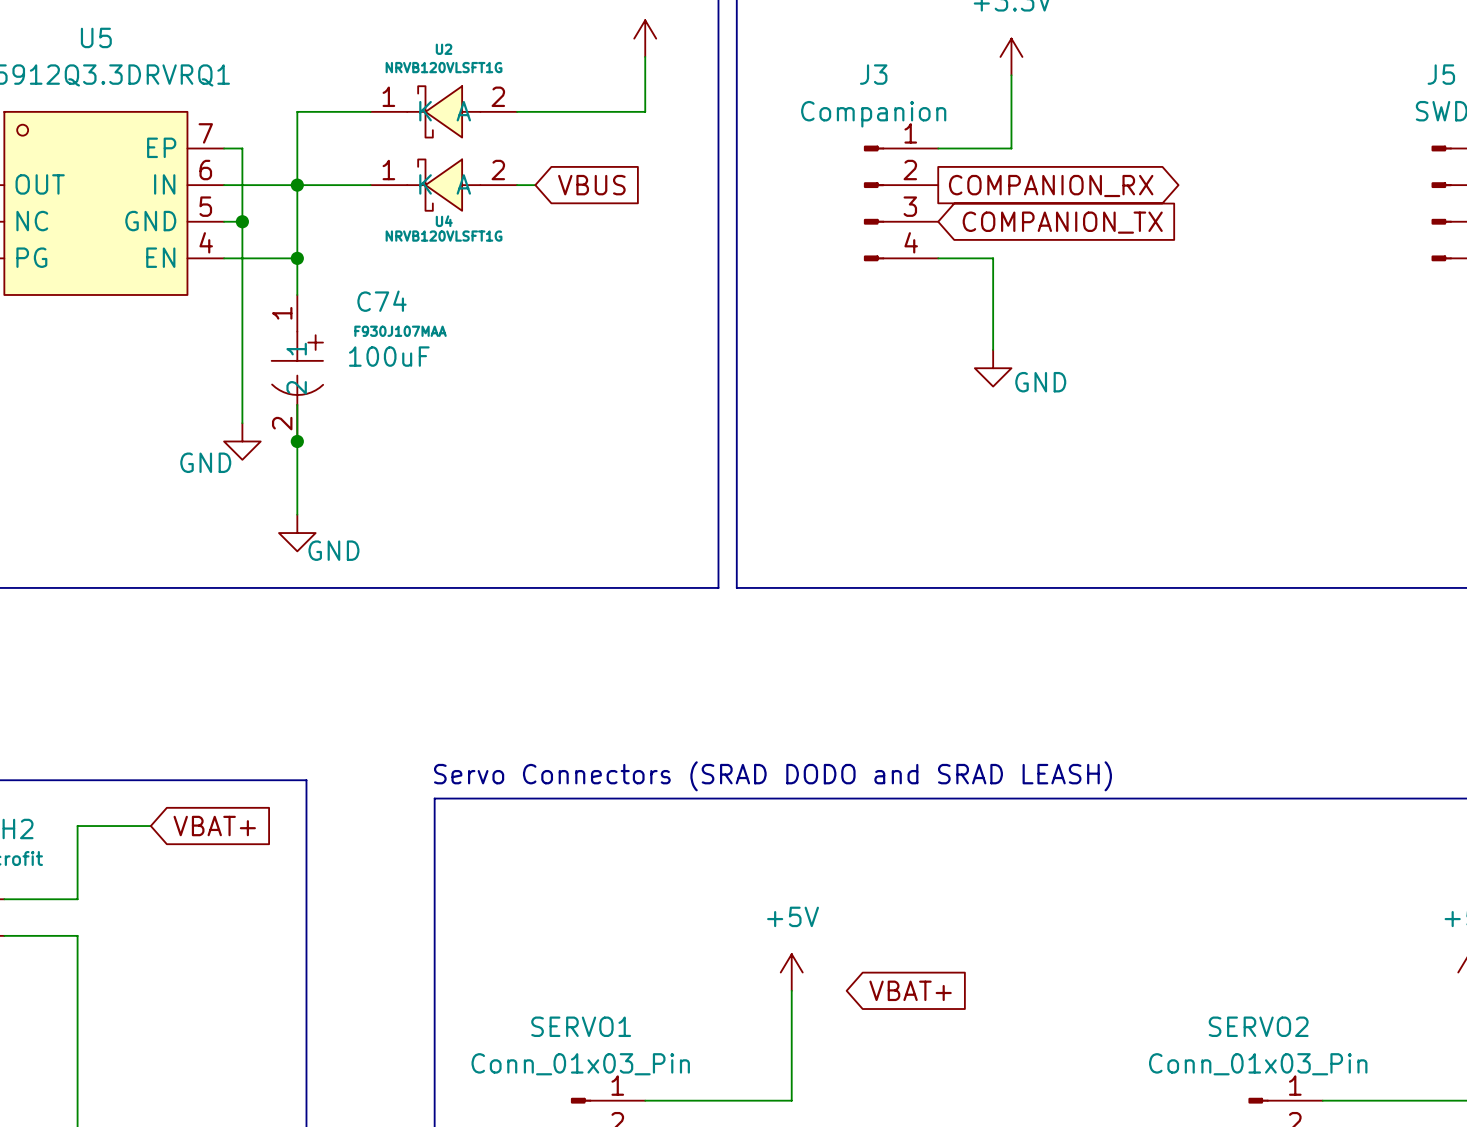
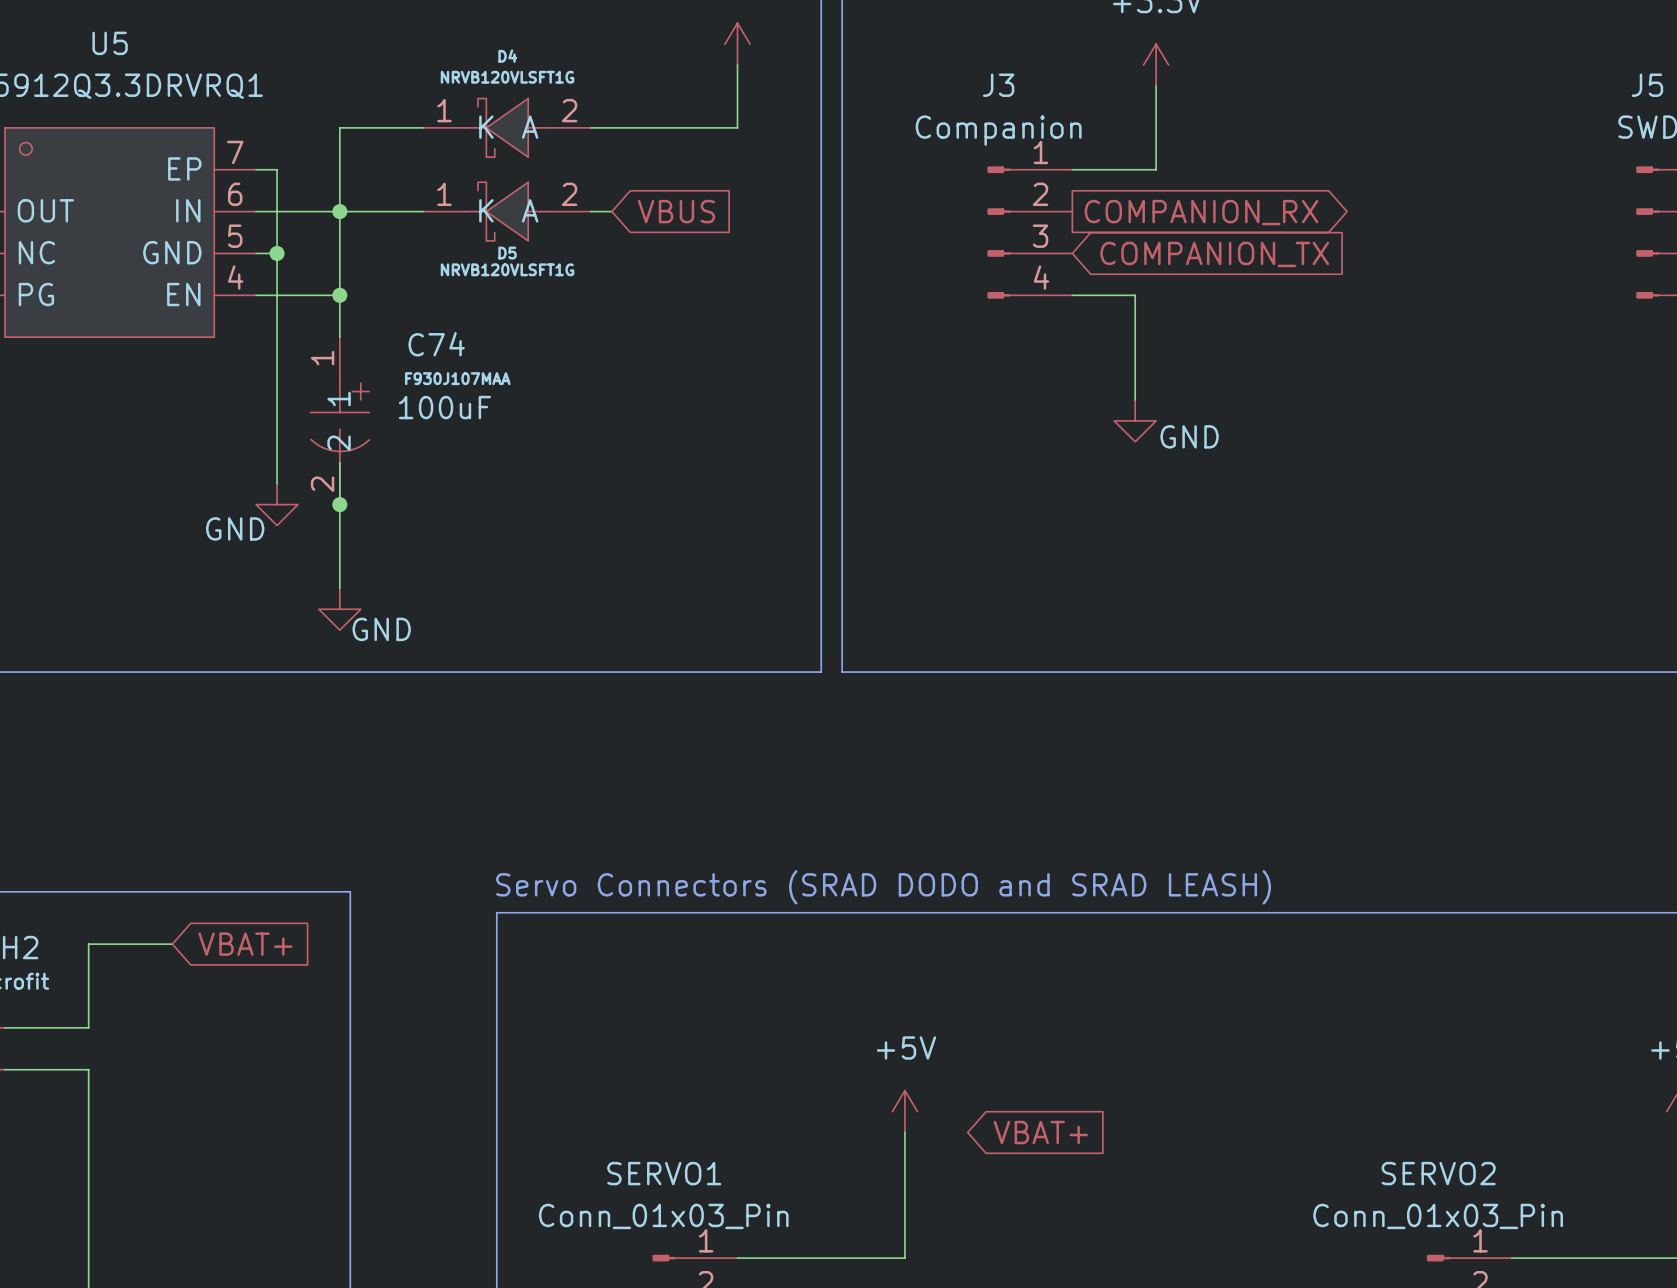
U2 name: U2 (444, 49) -> D4 (507, 56)
U4 name: U4 (444, 221) -> D5 (507, 253)

